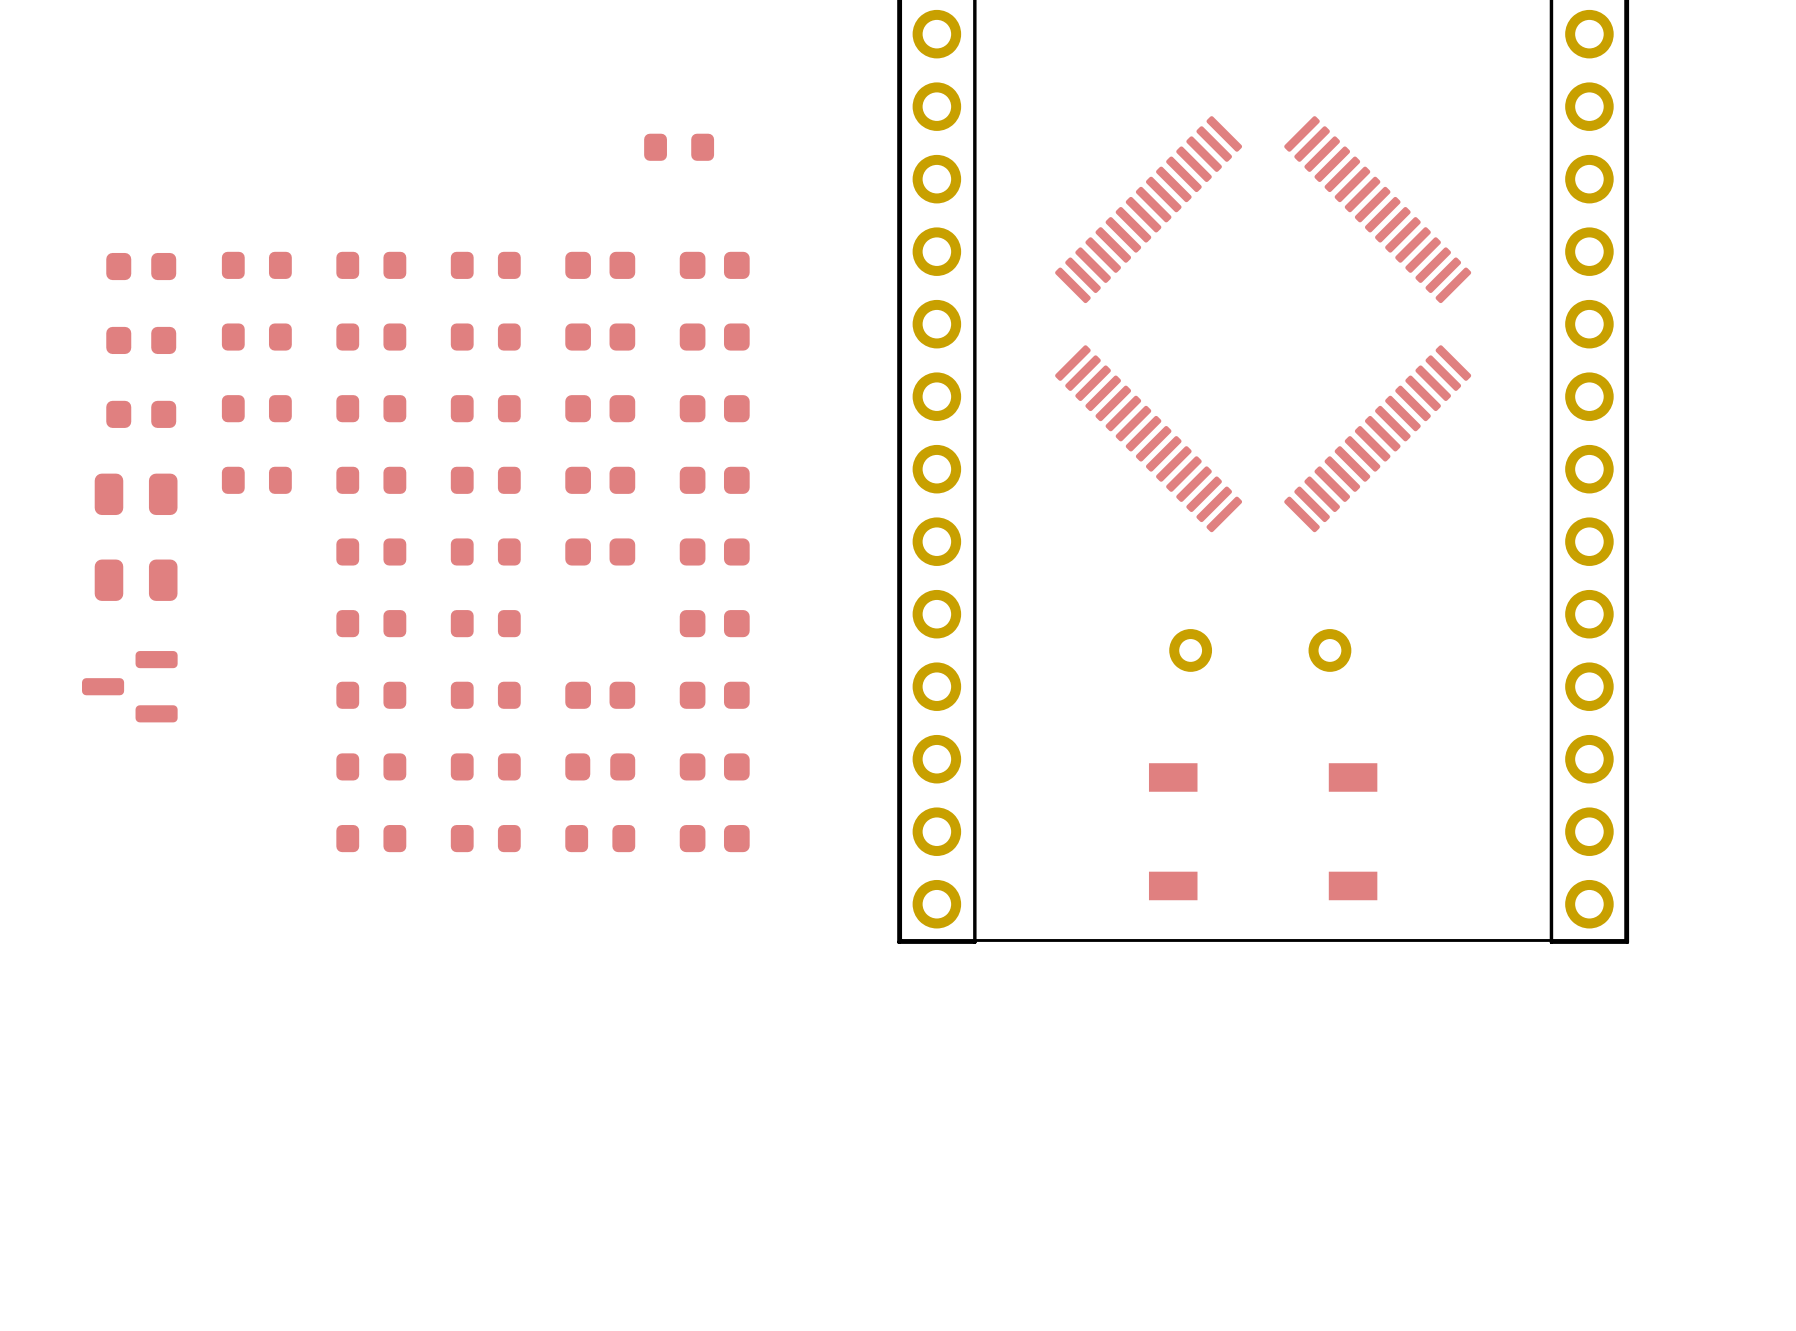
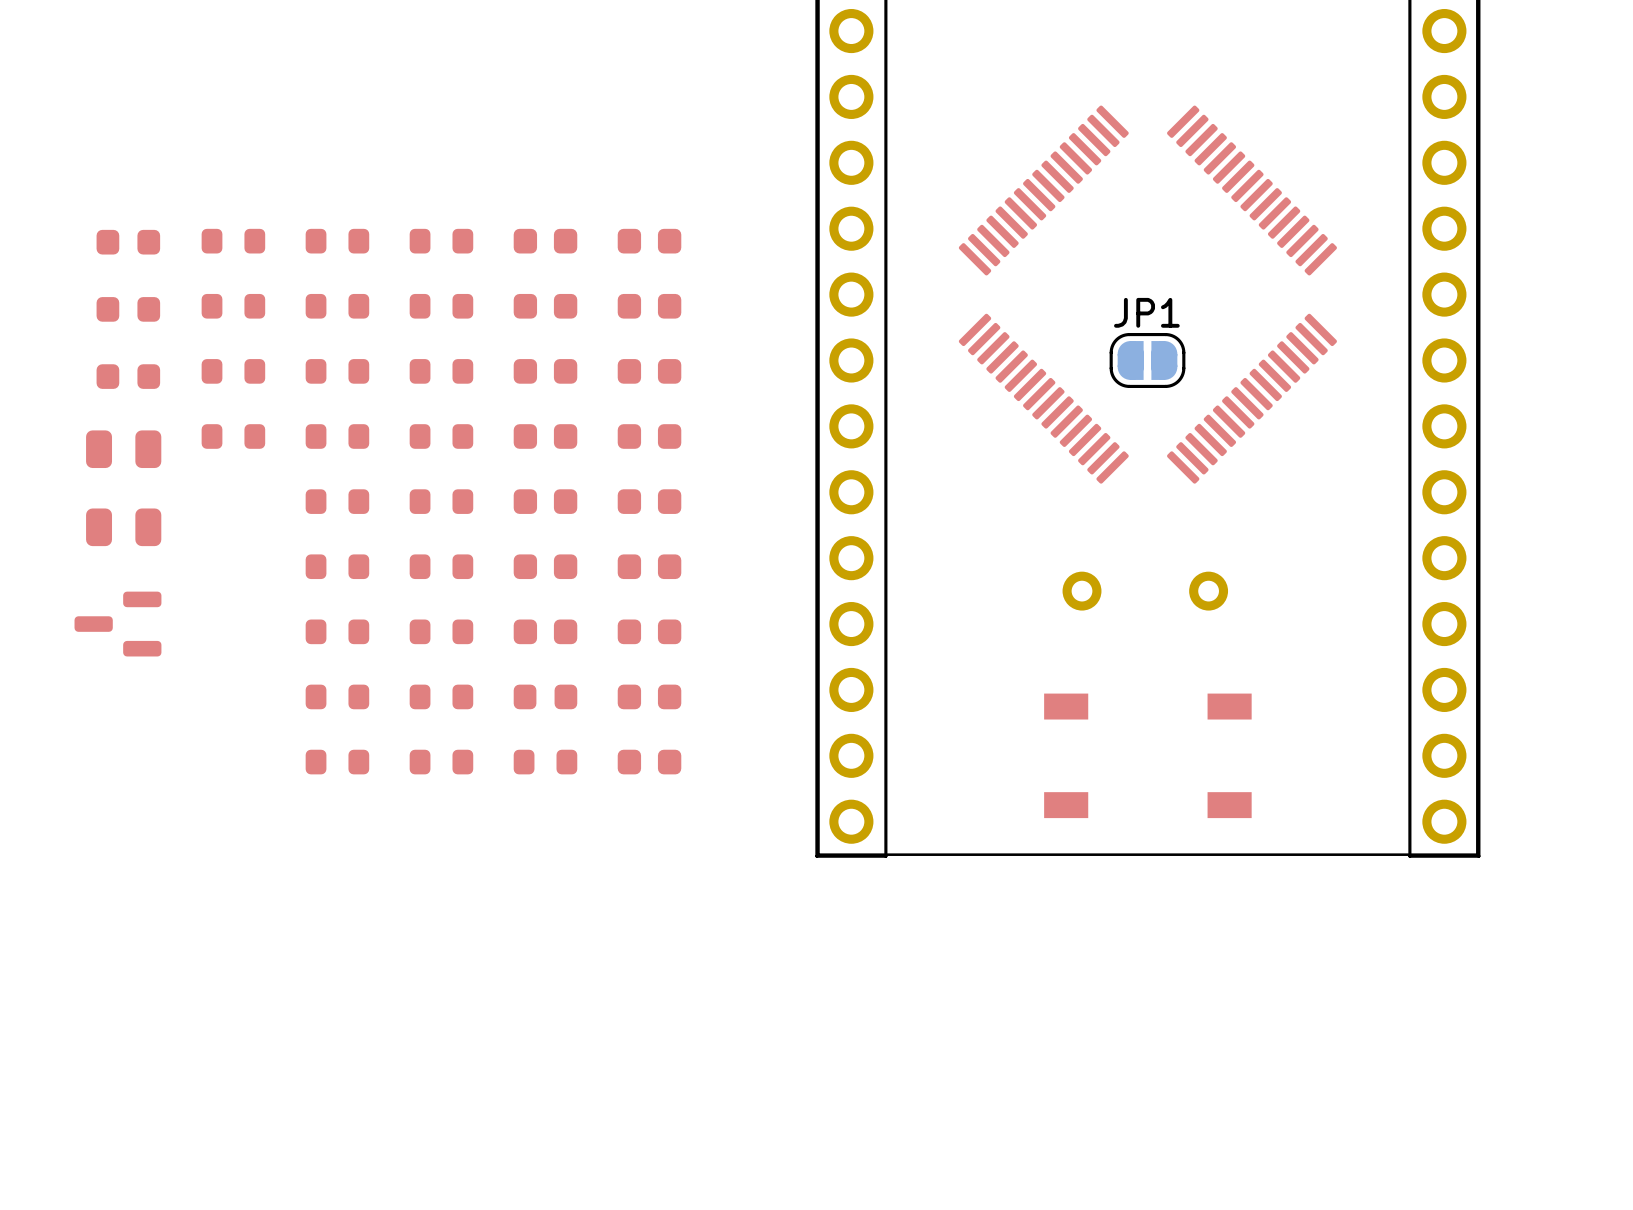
part: (679, 147) -> none
JP1: none -> (1147, 360)
part: none -> (545, 566)

